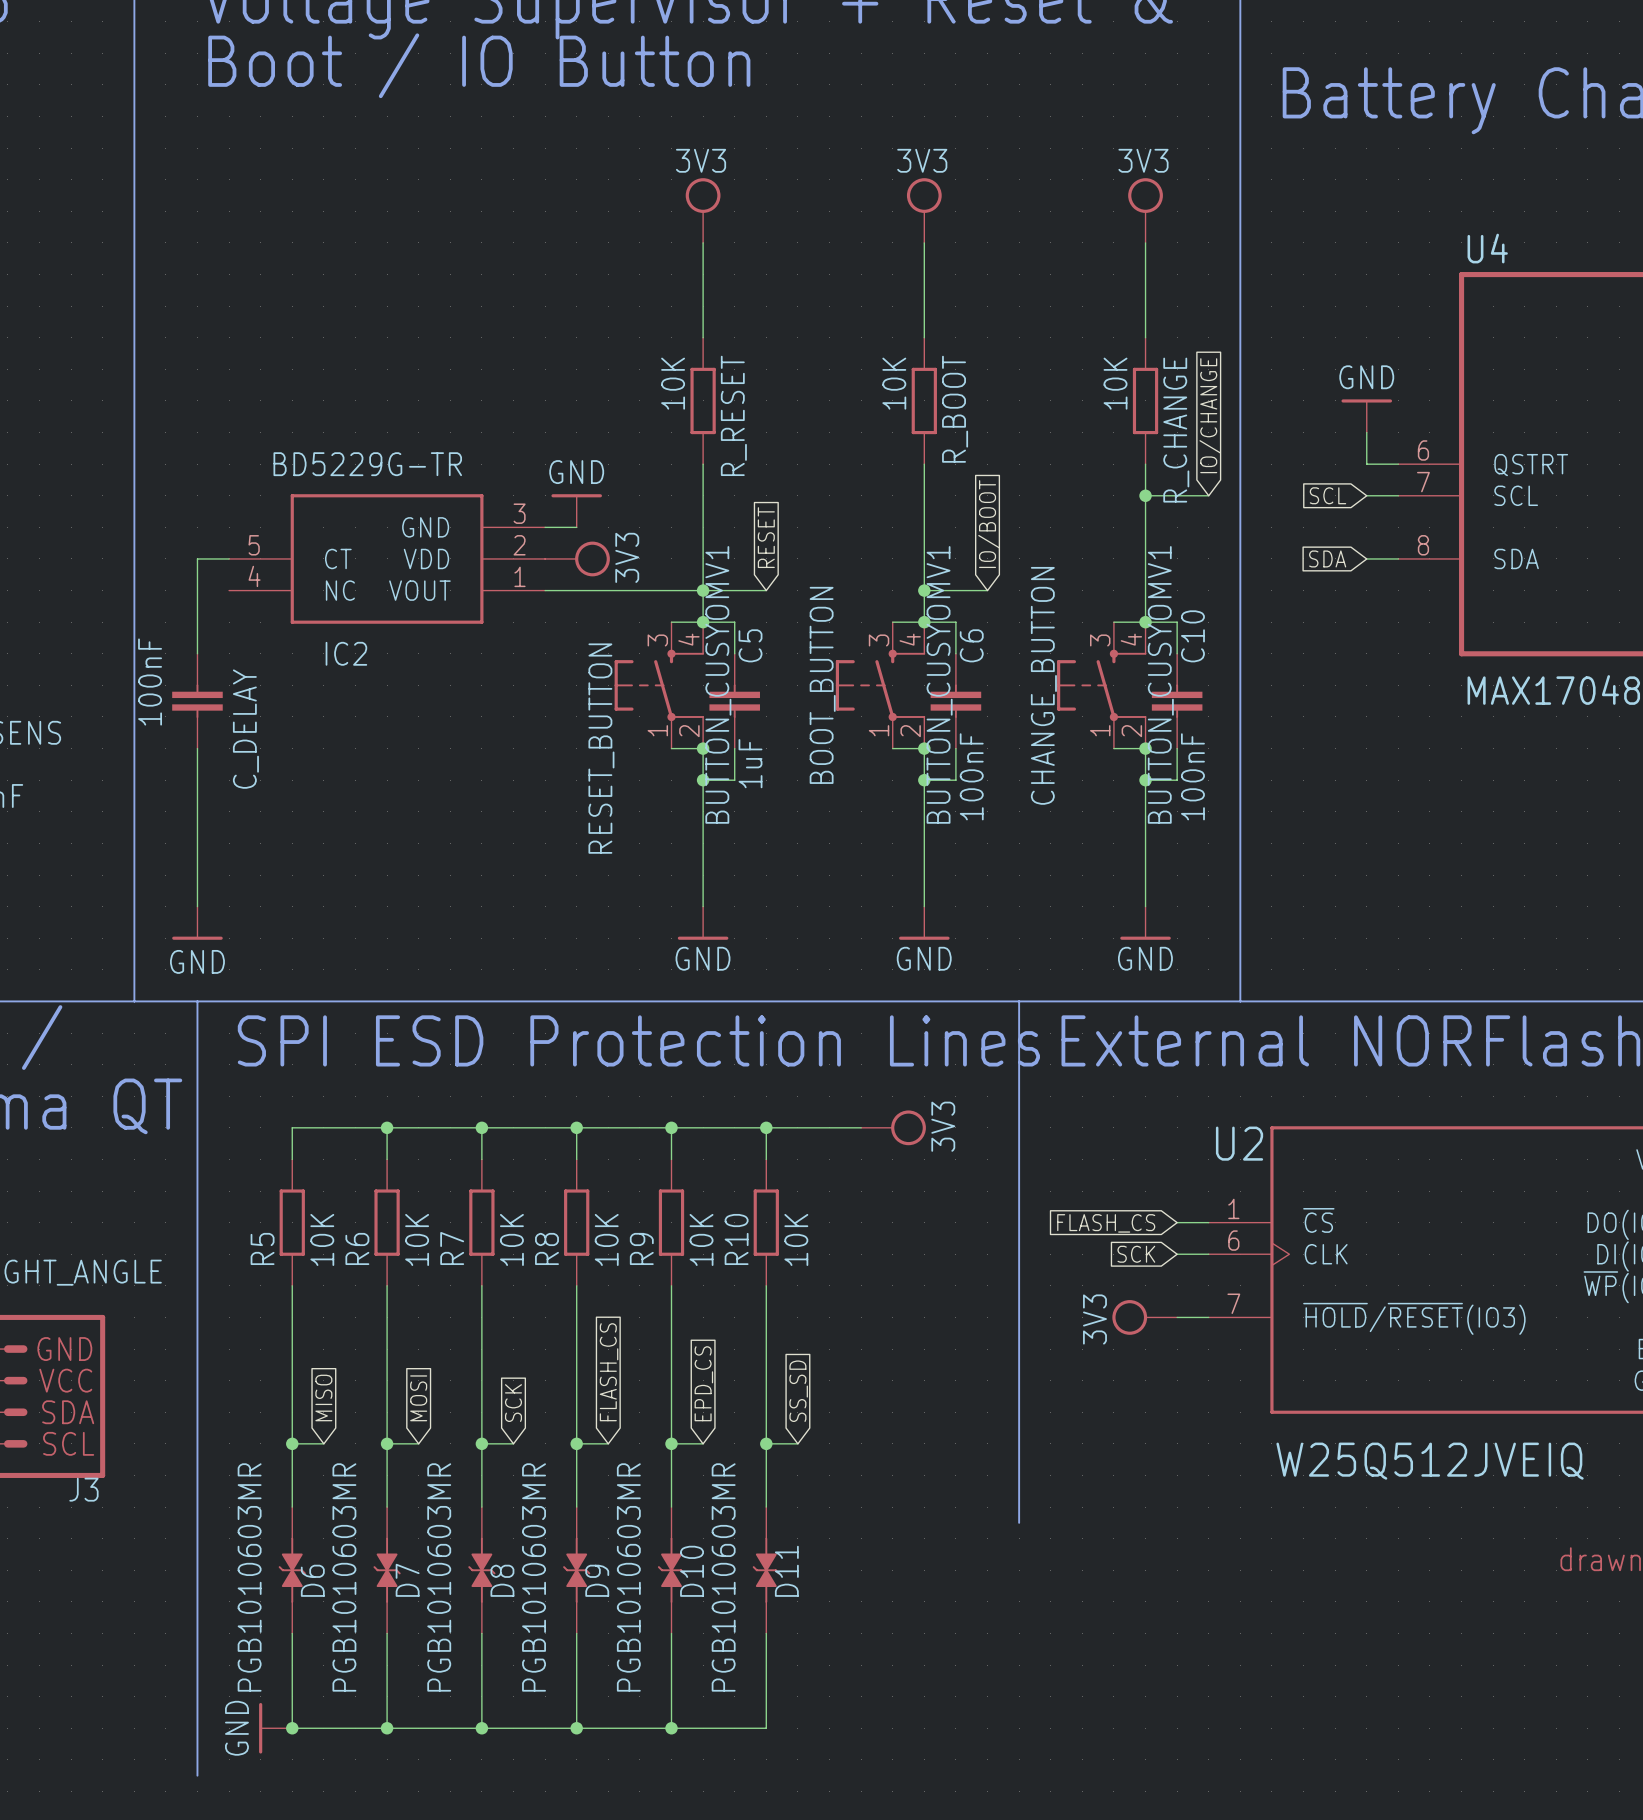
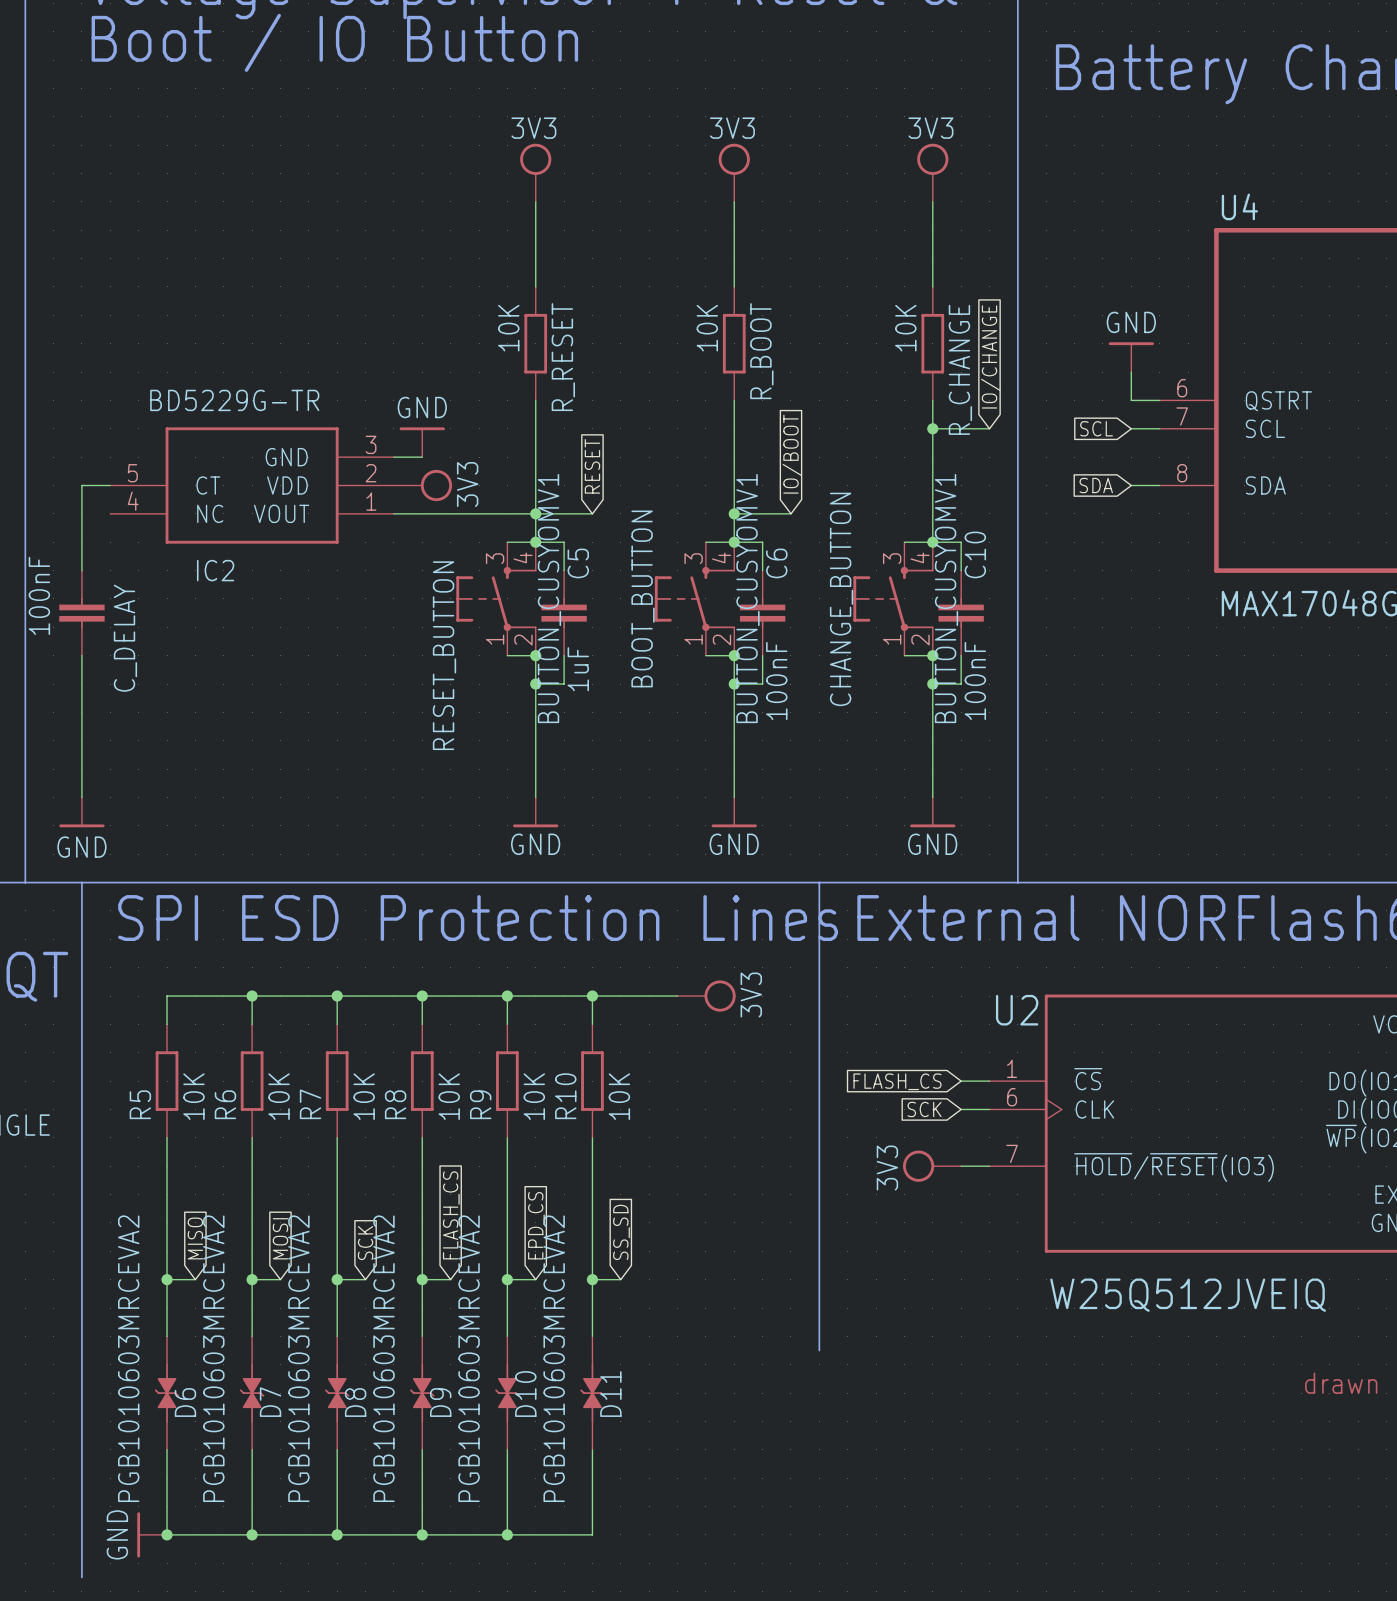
D6 value: PGB1010603MR (249, 1577) -> PGB1010603MRCEVA2 (128, 1358)
D7 value: PGB1010603MR (344, 1577) -> PGB1010603MRCEVA2 (213, 1358)
D8 value: PGB1010603MR (439, 1577) -> PGB1010603MRCEVA2 (298, 1358)
D9 value: PGB1010603MR (534, 1577) -> PGB1010603MRCEVA2 (383, 1358)
D10 value: PGB1010603MR (628, 1577) -> PGB1010603MRCEVA2 (469, 1358)
D11 value: PGB1010603MR (723, 1577) -> PGB1010603MRCEVA2 (554, 1358)

